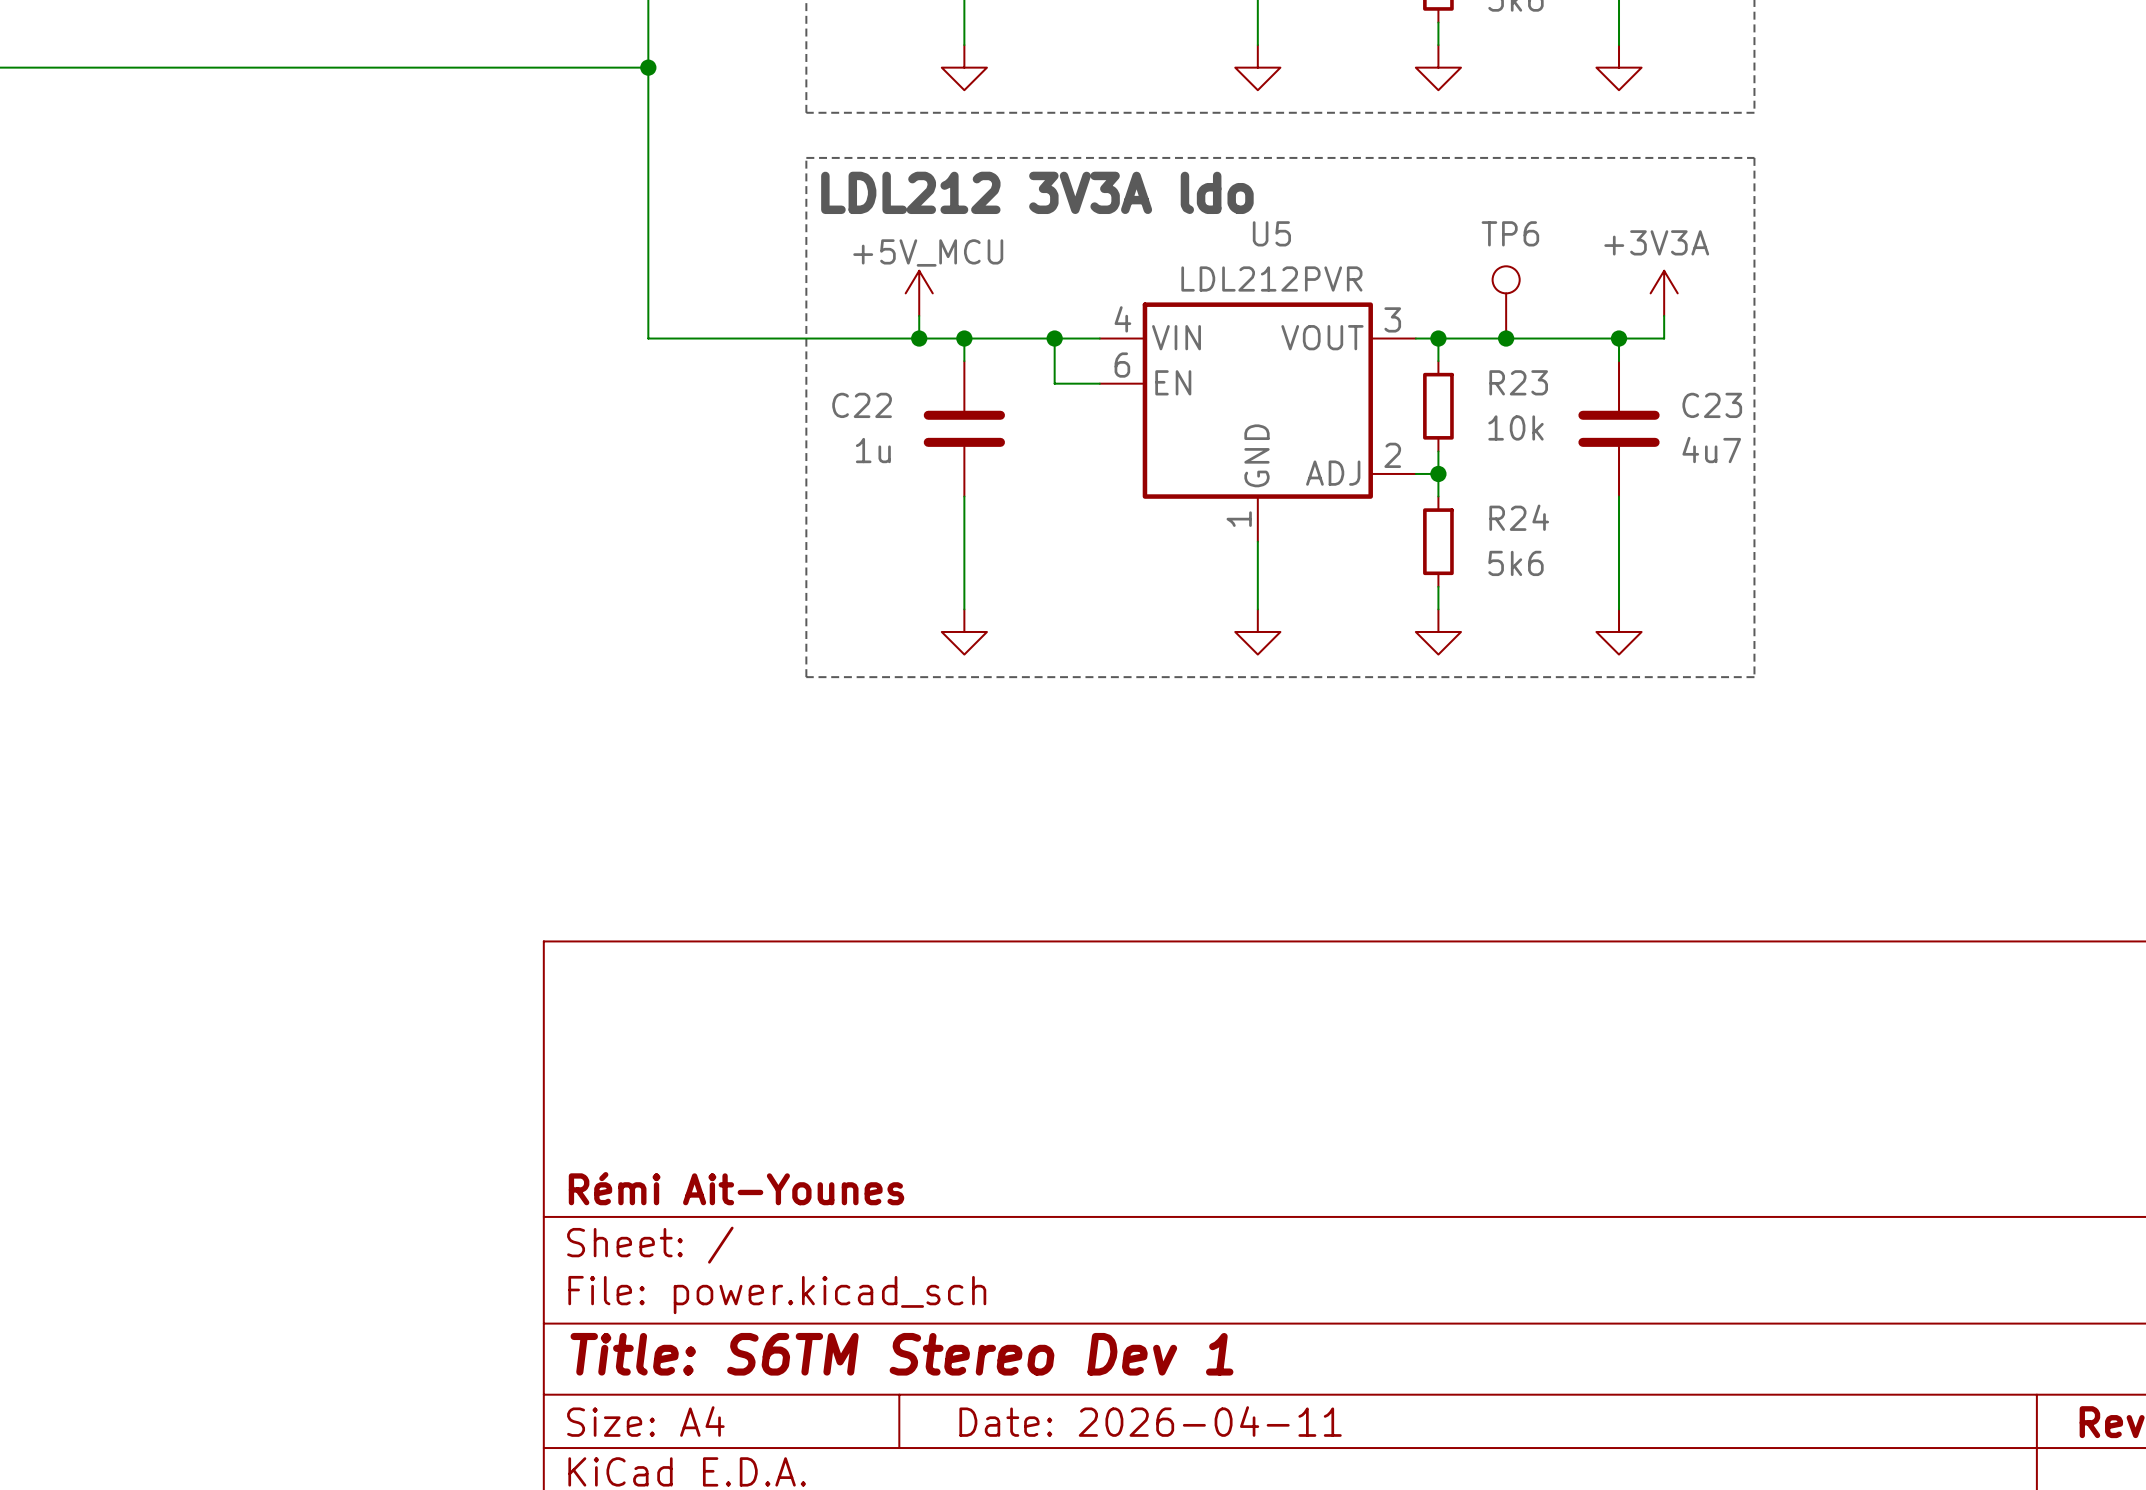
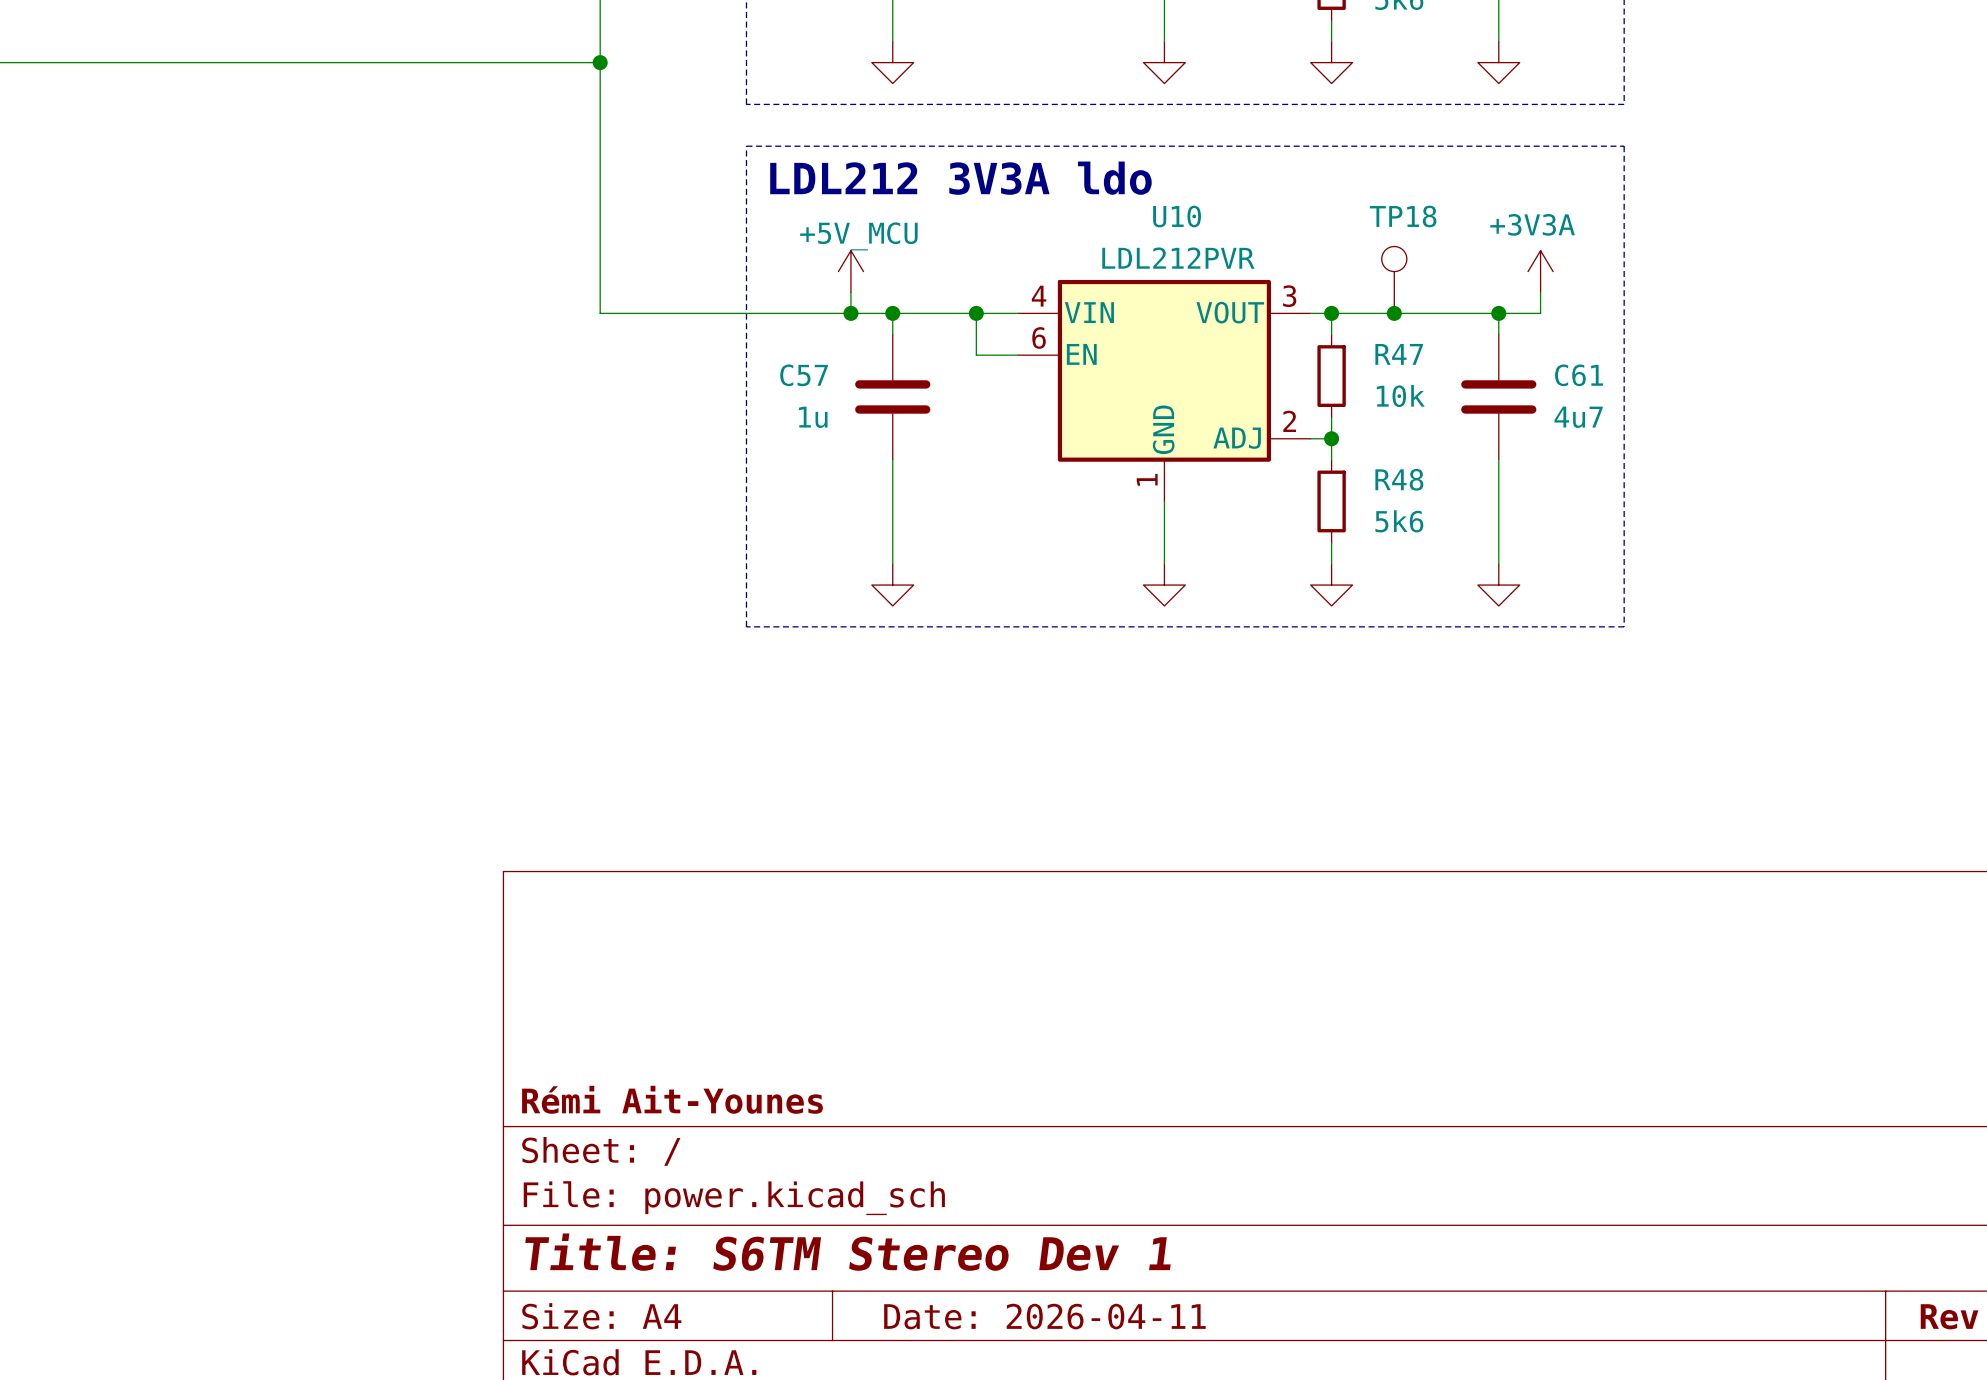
U5 name: U5 (1271, 233) -> U10 (1177, 216)
TP6 name: TP6 (1510, 233) -> TP18 (1403, 216)
R23 name: R23 (1518, 382) -> R47 (1399, 354)
C22 name: C22 (862, 405) -> C57 (804, 375)
C23 name: C23 (1712, 405) -> C61 (1579, 375)
R24 name: R24 (1519, 517) -> R48 (1399, 479)

